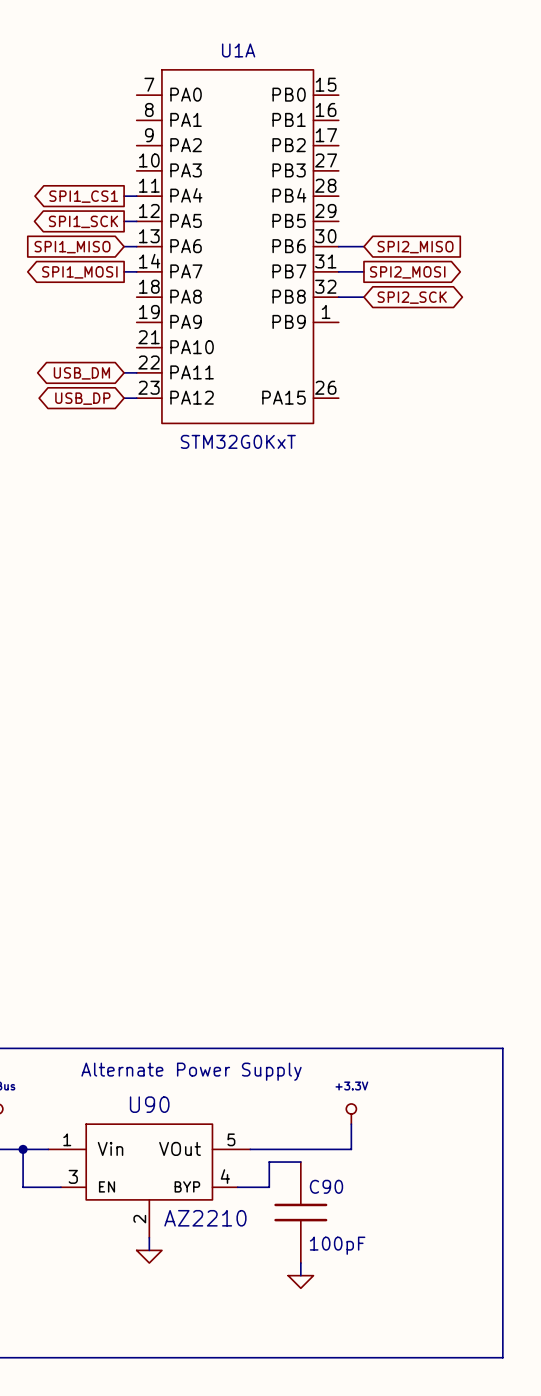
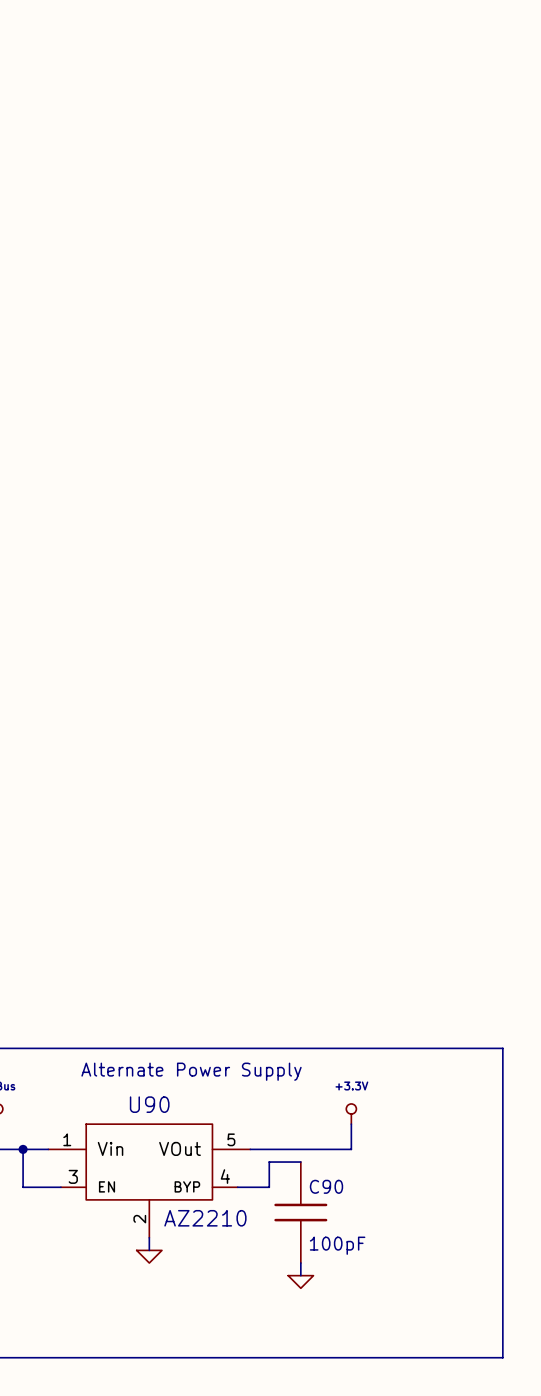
global label: SPI1_CS1 (83, 196) -> none
wire: (124, 196) (136, 196) -> none
global label: SPI1_SCK (83, 221) -> none
wire: (124, 221) (136, 221) -> none
wire: (124, 246) (136, 246) -> none
U1A: STM32G0KxT (237, 246) -> none
wire: (338, 246) (363, 246) -> none
global label: SPI1_MISO (72, 247) -> none
global label: SPI2_MISO (415, 247) -> none
wire: (124, 271) (136, 271) -> none
wire: (338, 271) (363, 271) -> none
global label: SPI1_MOSI (79, 272) -> none
global label: SPI2_MOSI (407, 272) -> none
wire: (338, 297) (363, 297) -> none
global label: SPI2_SCK (412, 297) -> none
wire: (124, 372) (136, 372) -> none
global label: USB_DM (81, 373) -> none
global label: USB_DP (82, 398) -> none
wire: (124, 398) (136, 398) -> none

